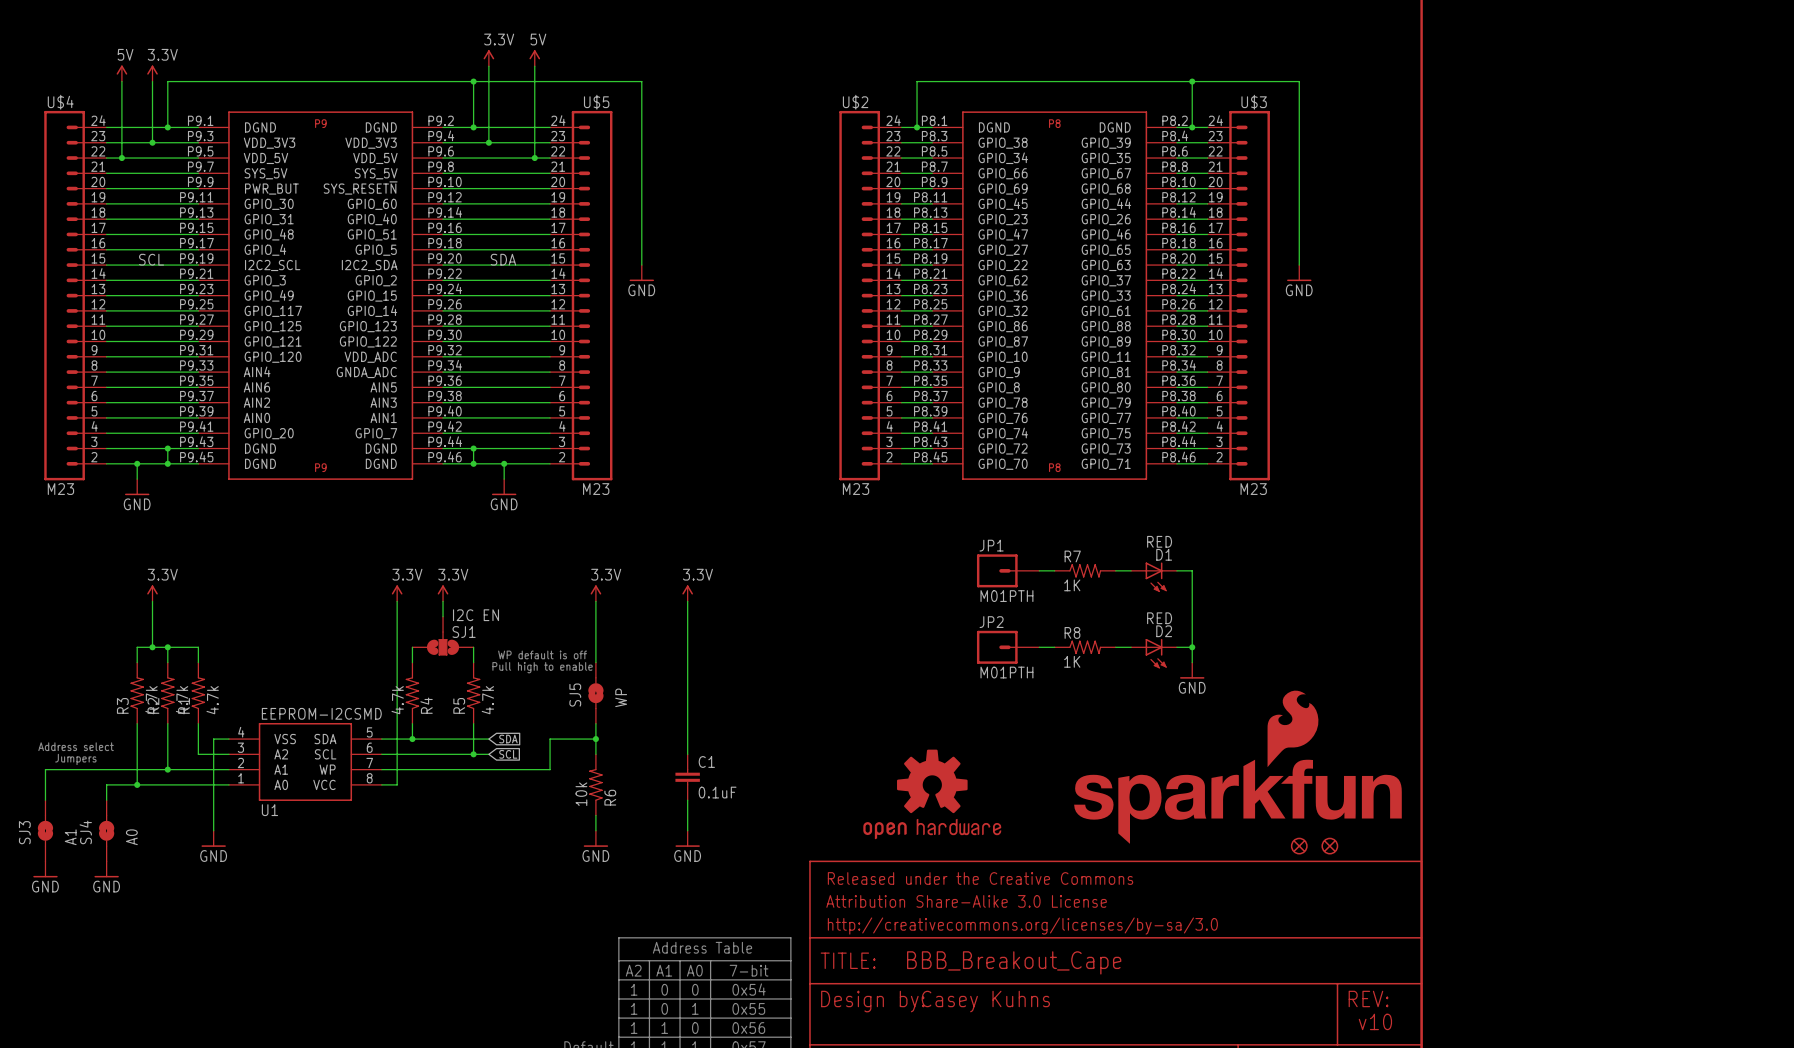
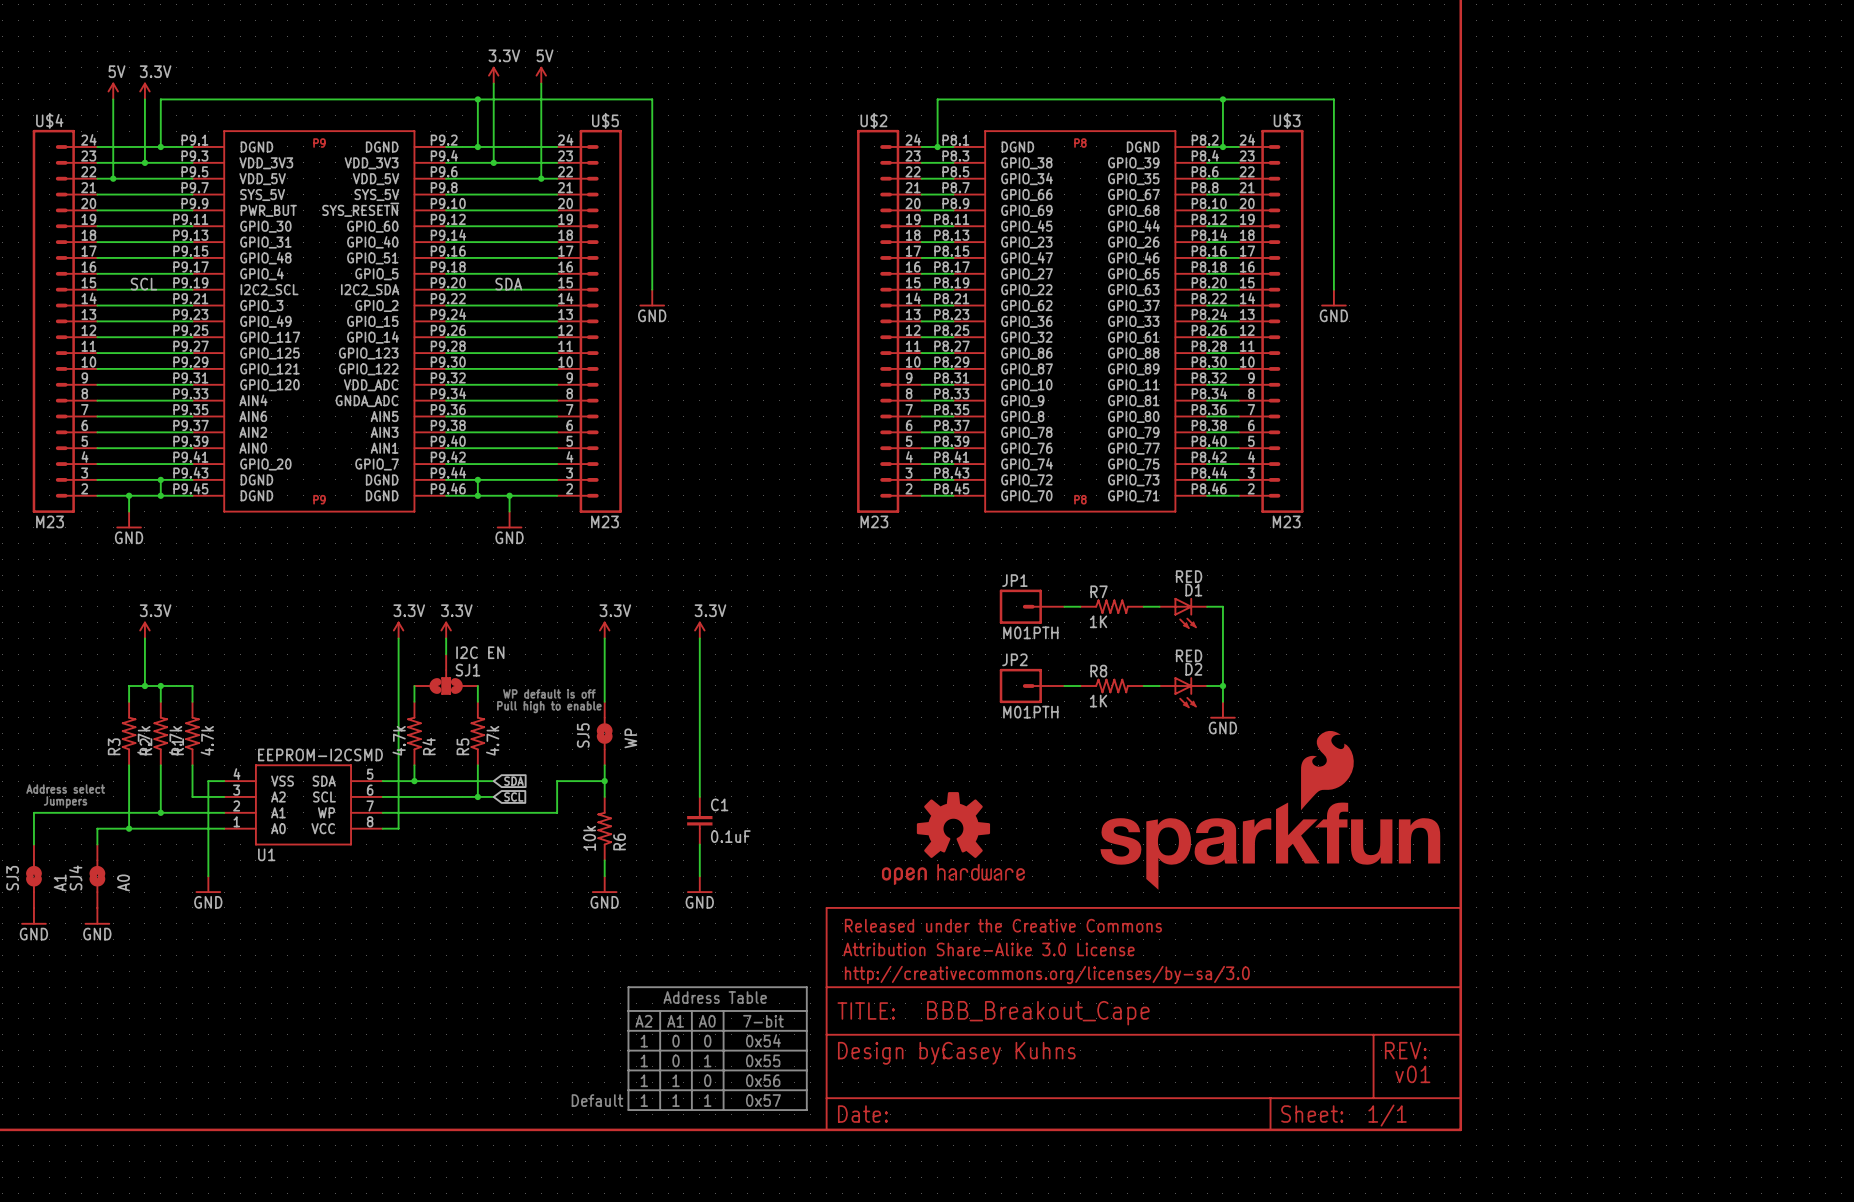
part: (1299, 846) -> none
part: (1329, 846) -> none
text: v10 (1375, 1021) -> v01 (1412, 1074)

